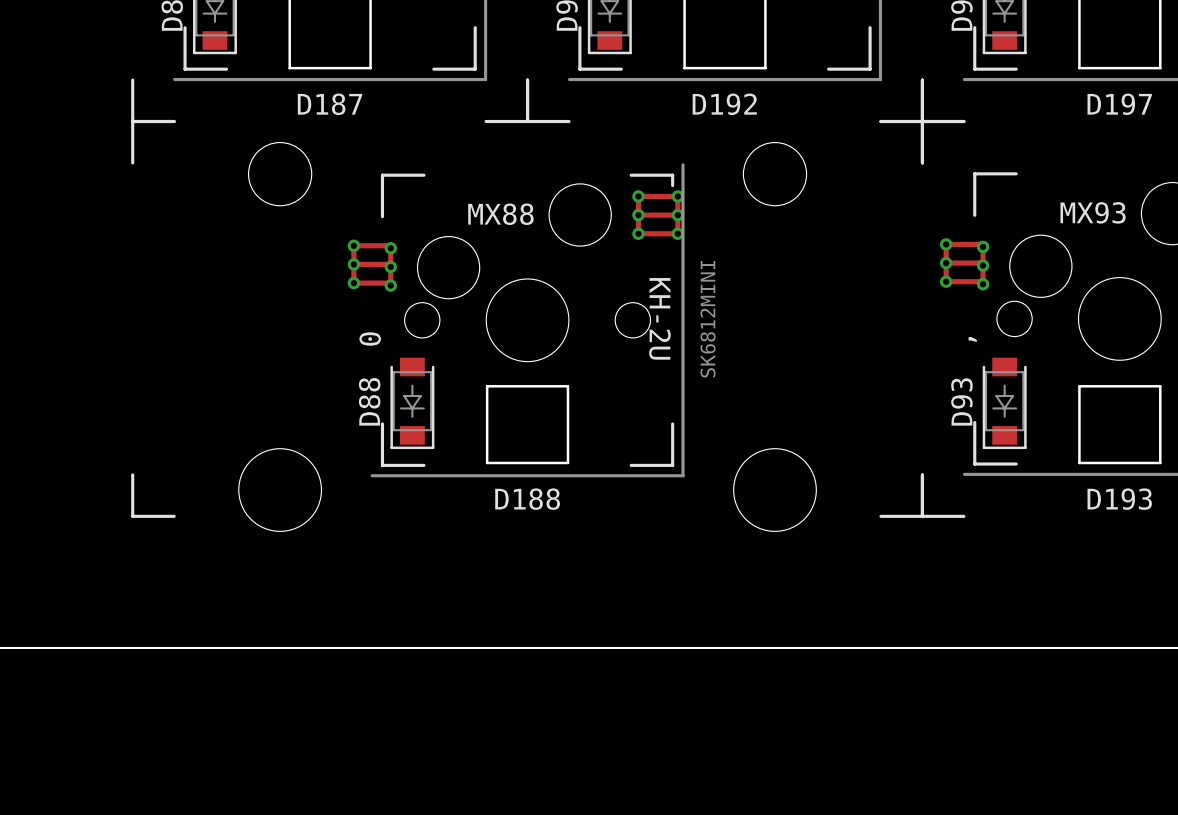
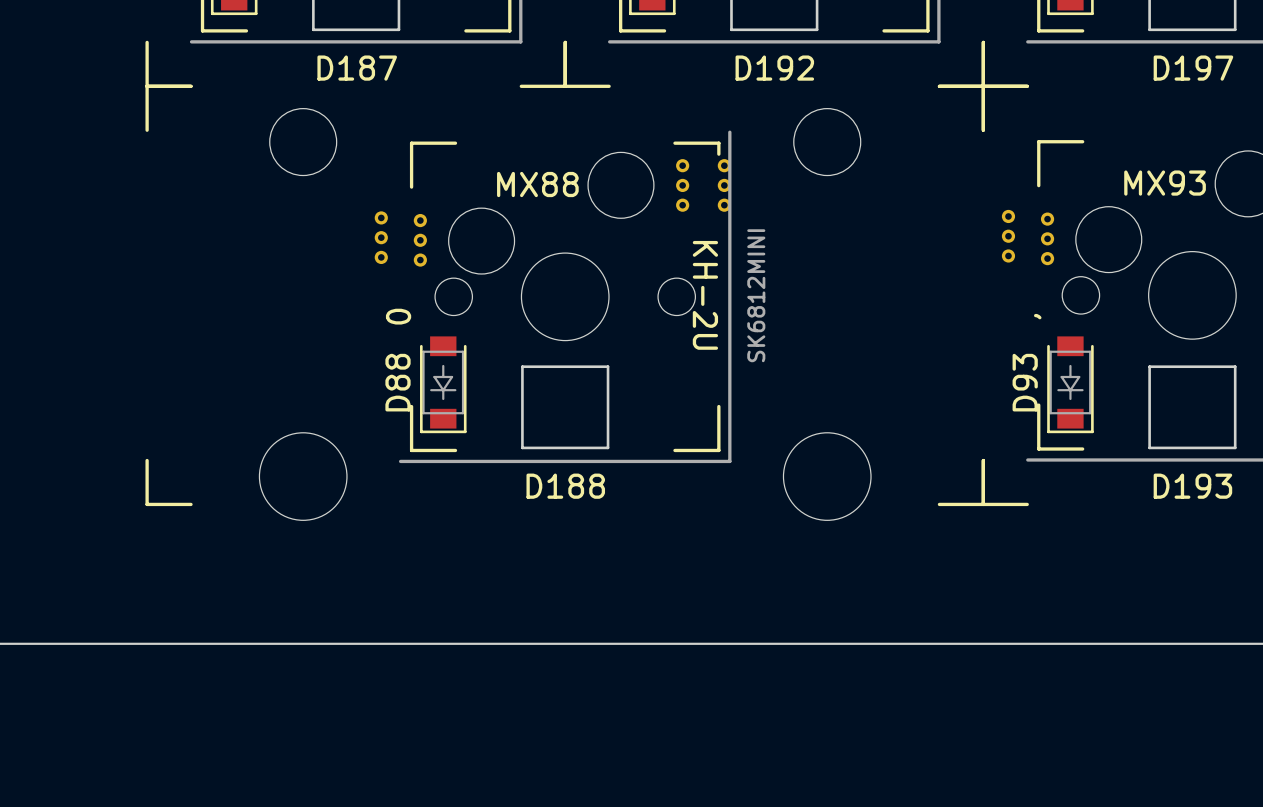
track: (638, 196) (638, 233) (677, 233) (677, 196) (638, 196) -> none
track: (638, 215) (677, 215) -> none
track: (946, 244) (946, 281) (980, 281) (983, 284) (983, 246) (980, 244) (946, 244) -> none
track: (946, 263) (980, 263) (983, 265) -> none
track: (353, 264) (388, 264) (390, 266) -> none
track: (353, 283) (353, 245) (388, 245) (390, 248) (390, 285) (388, 283) (353, 283) -> none

